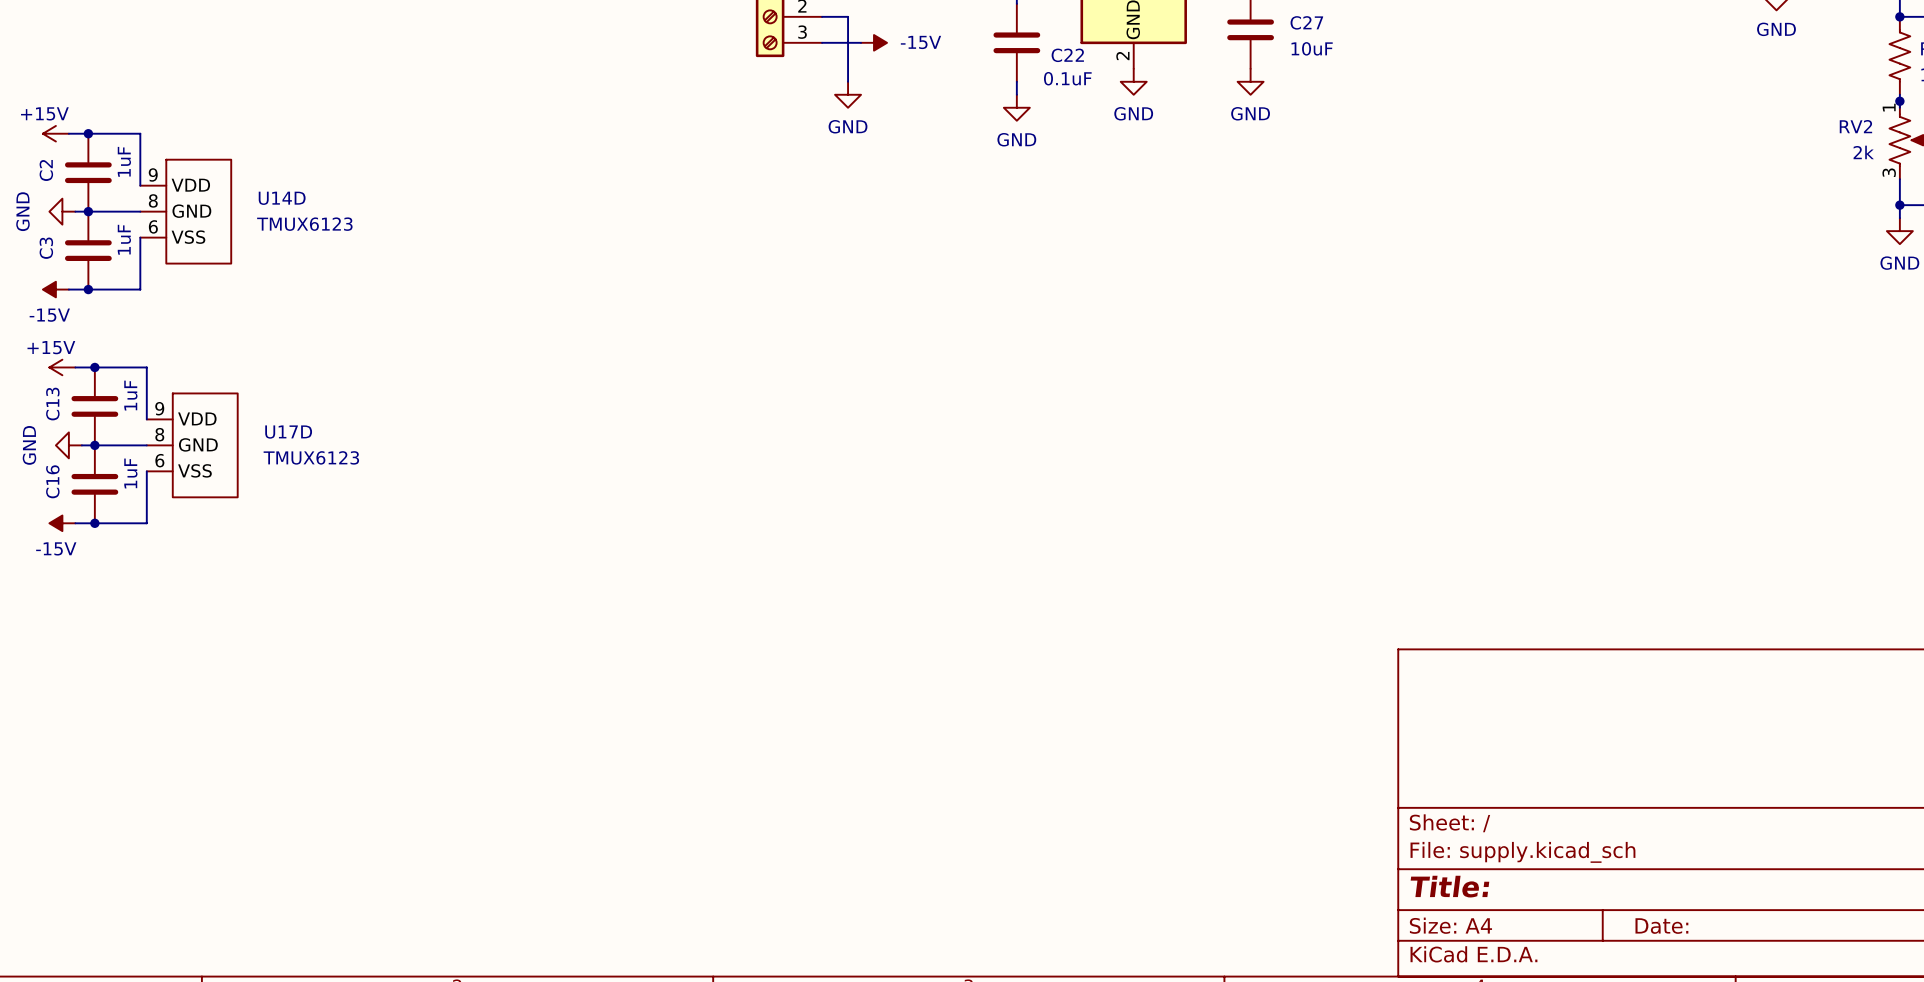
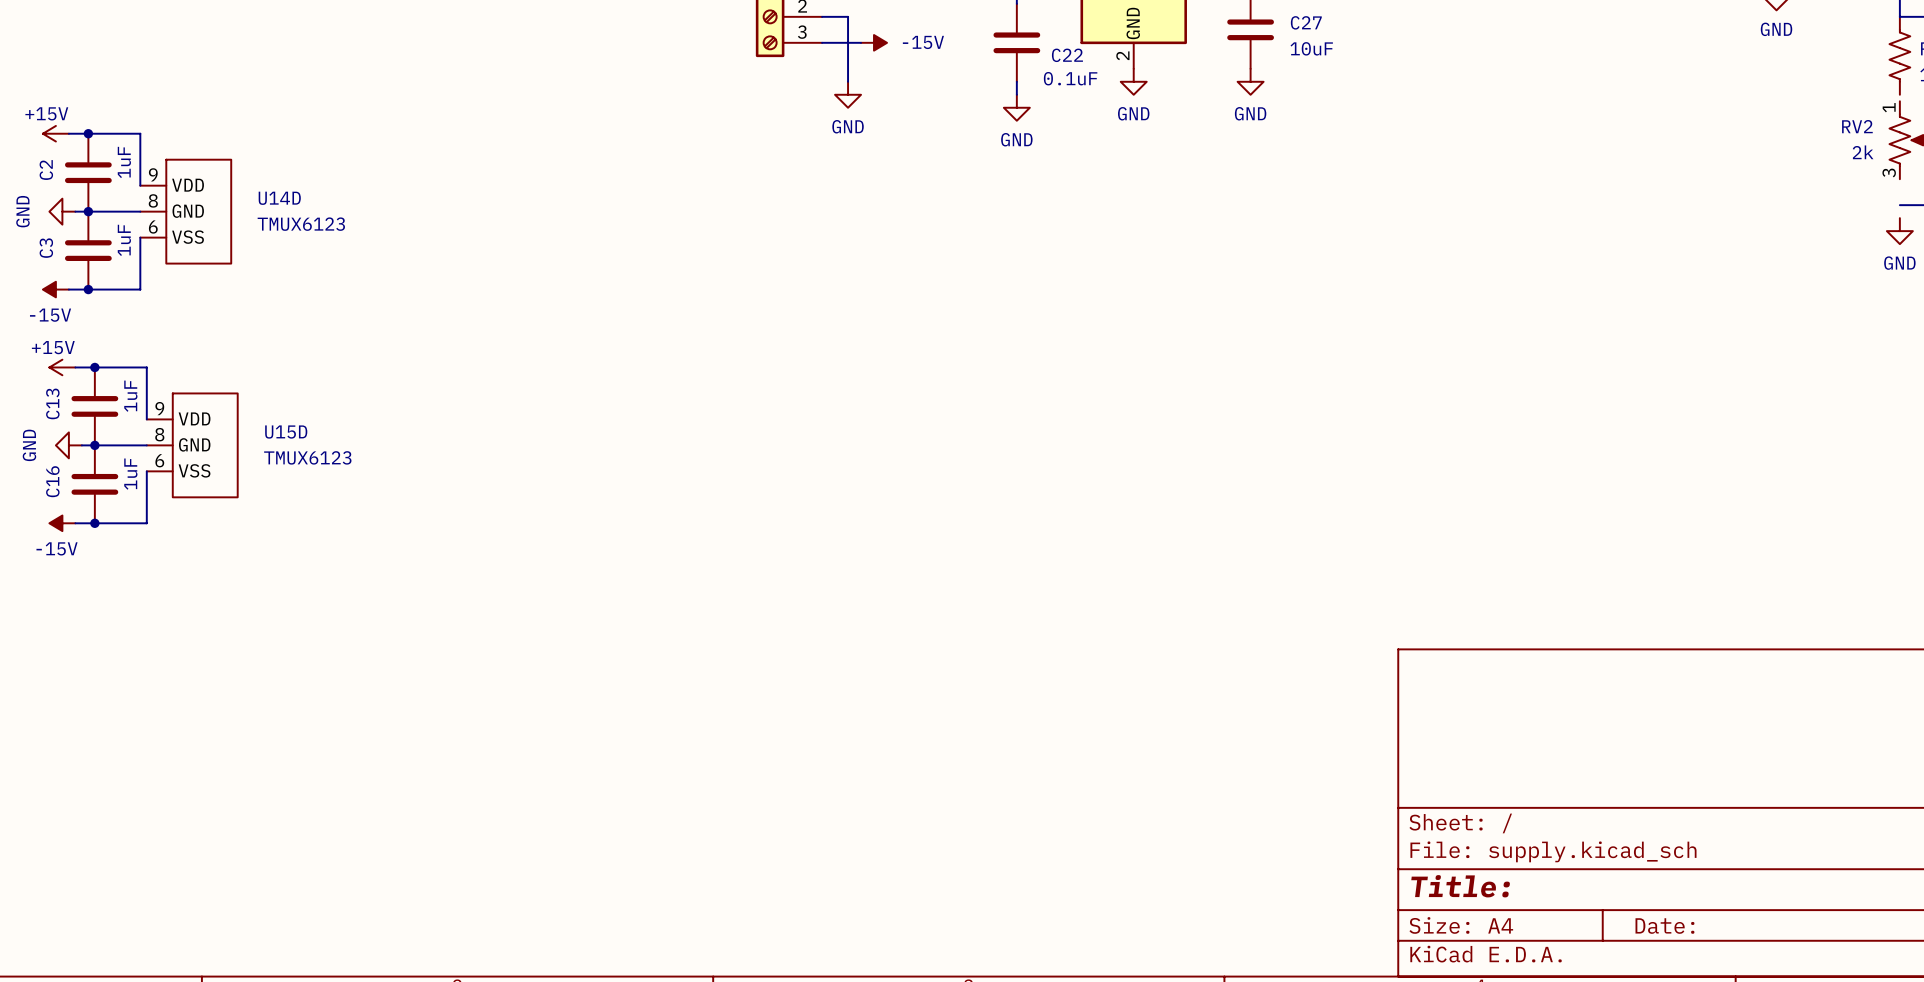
junction: (1899, 16) -> none
junction: (1899, 101) -> none
wire: (1899, 179) (1899, 218) -> none
junction: (1899, 205) -> none
U17D name: U17D (288, 432) -> U15D (286, 432)

